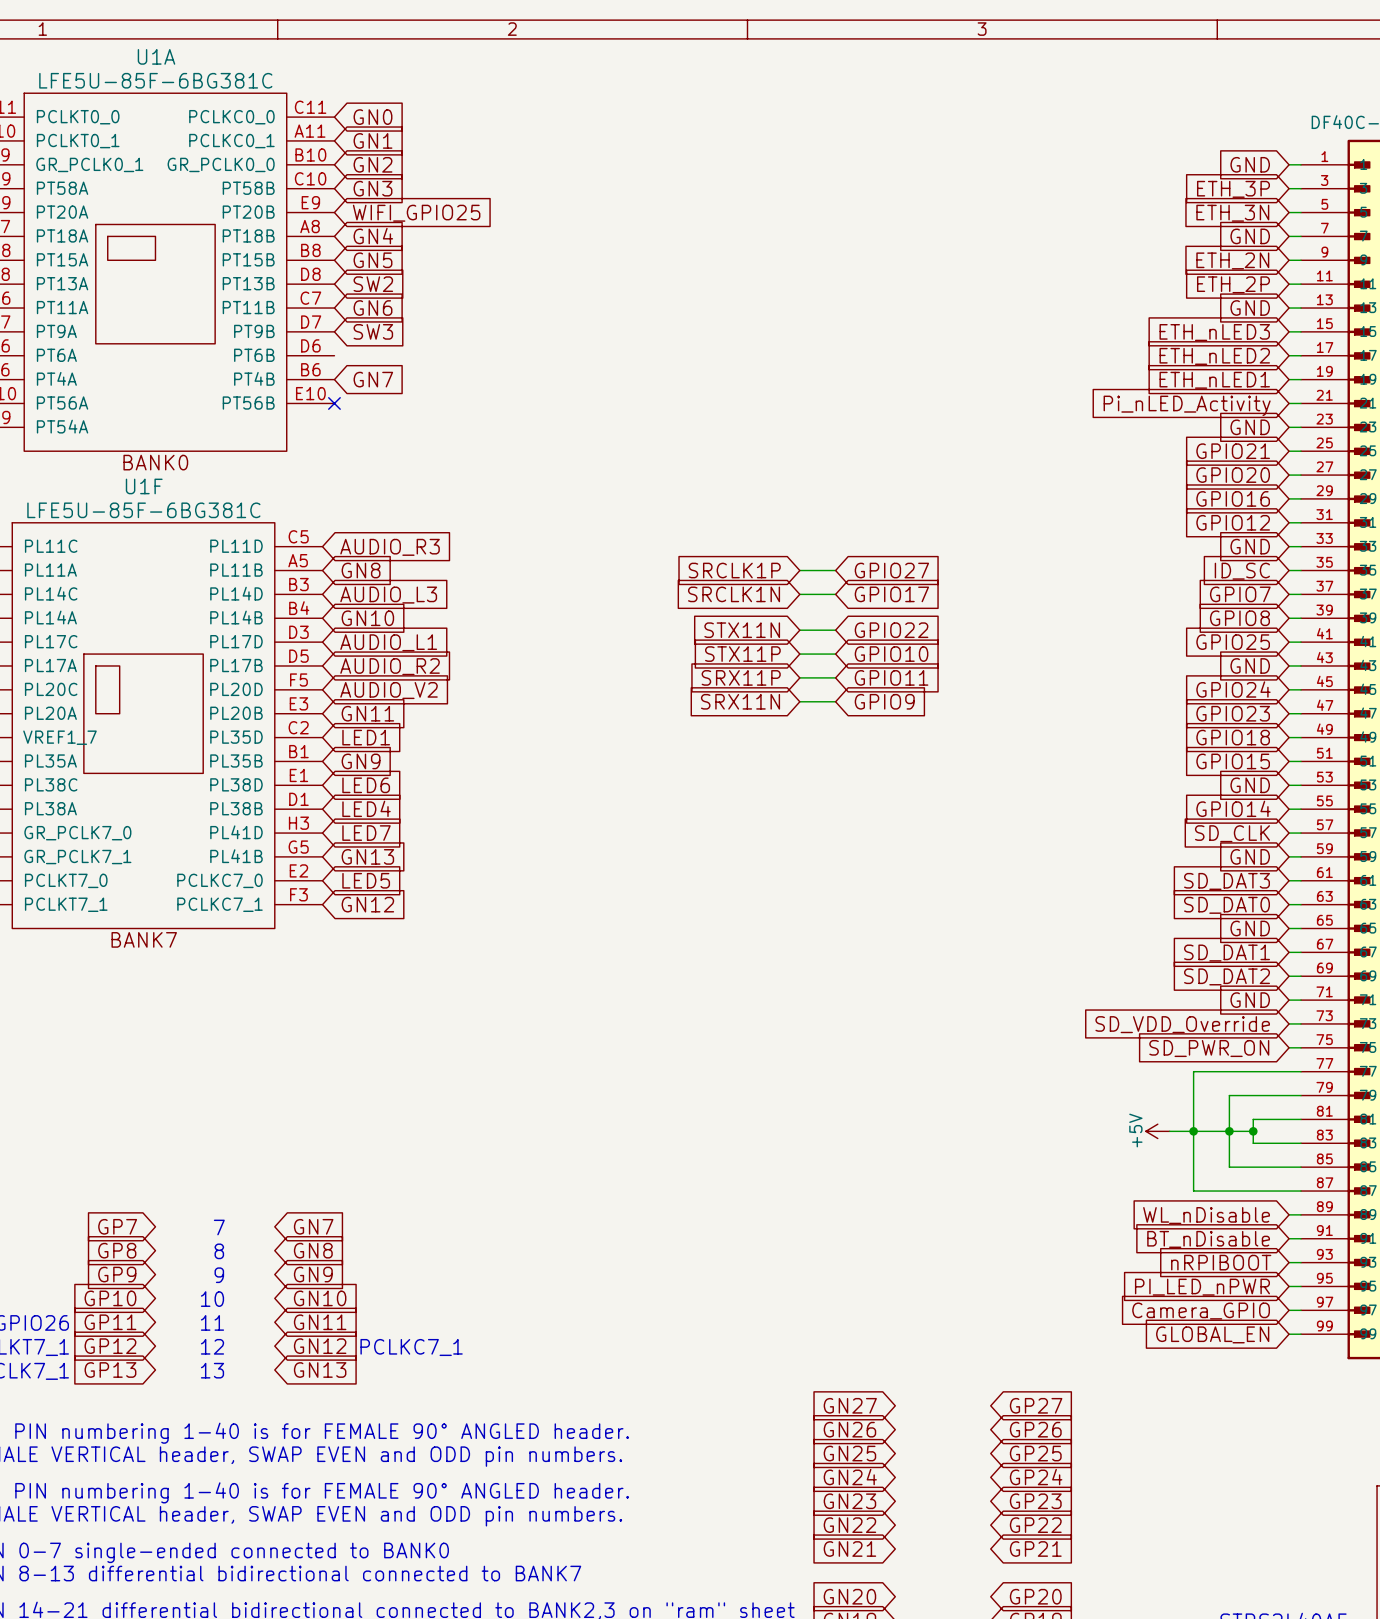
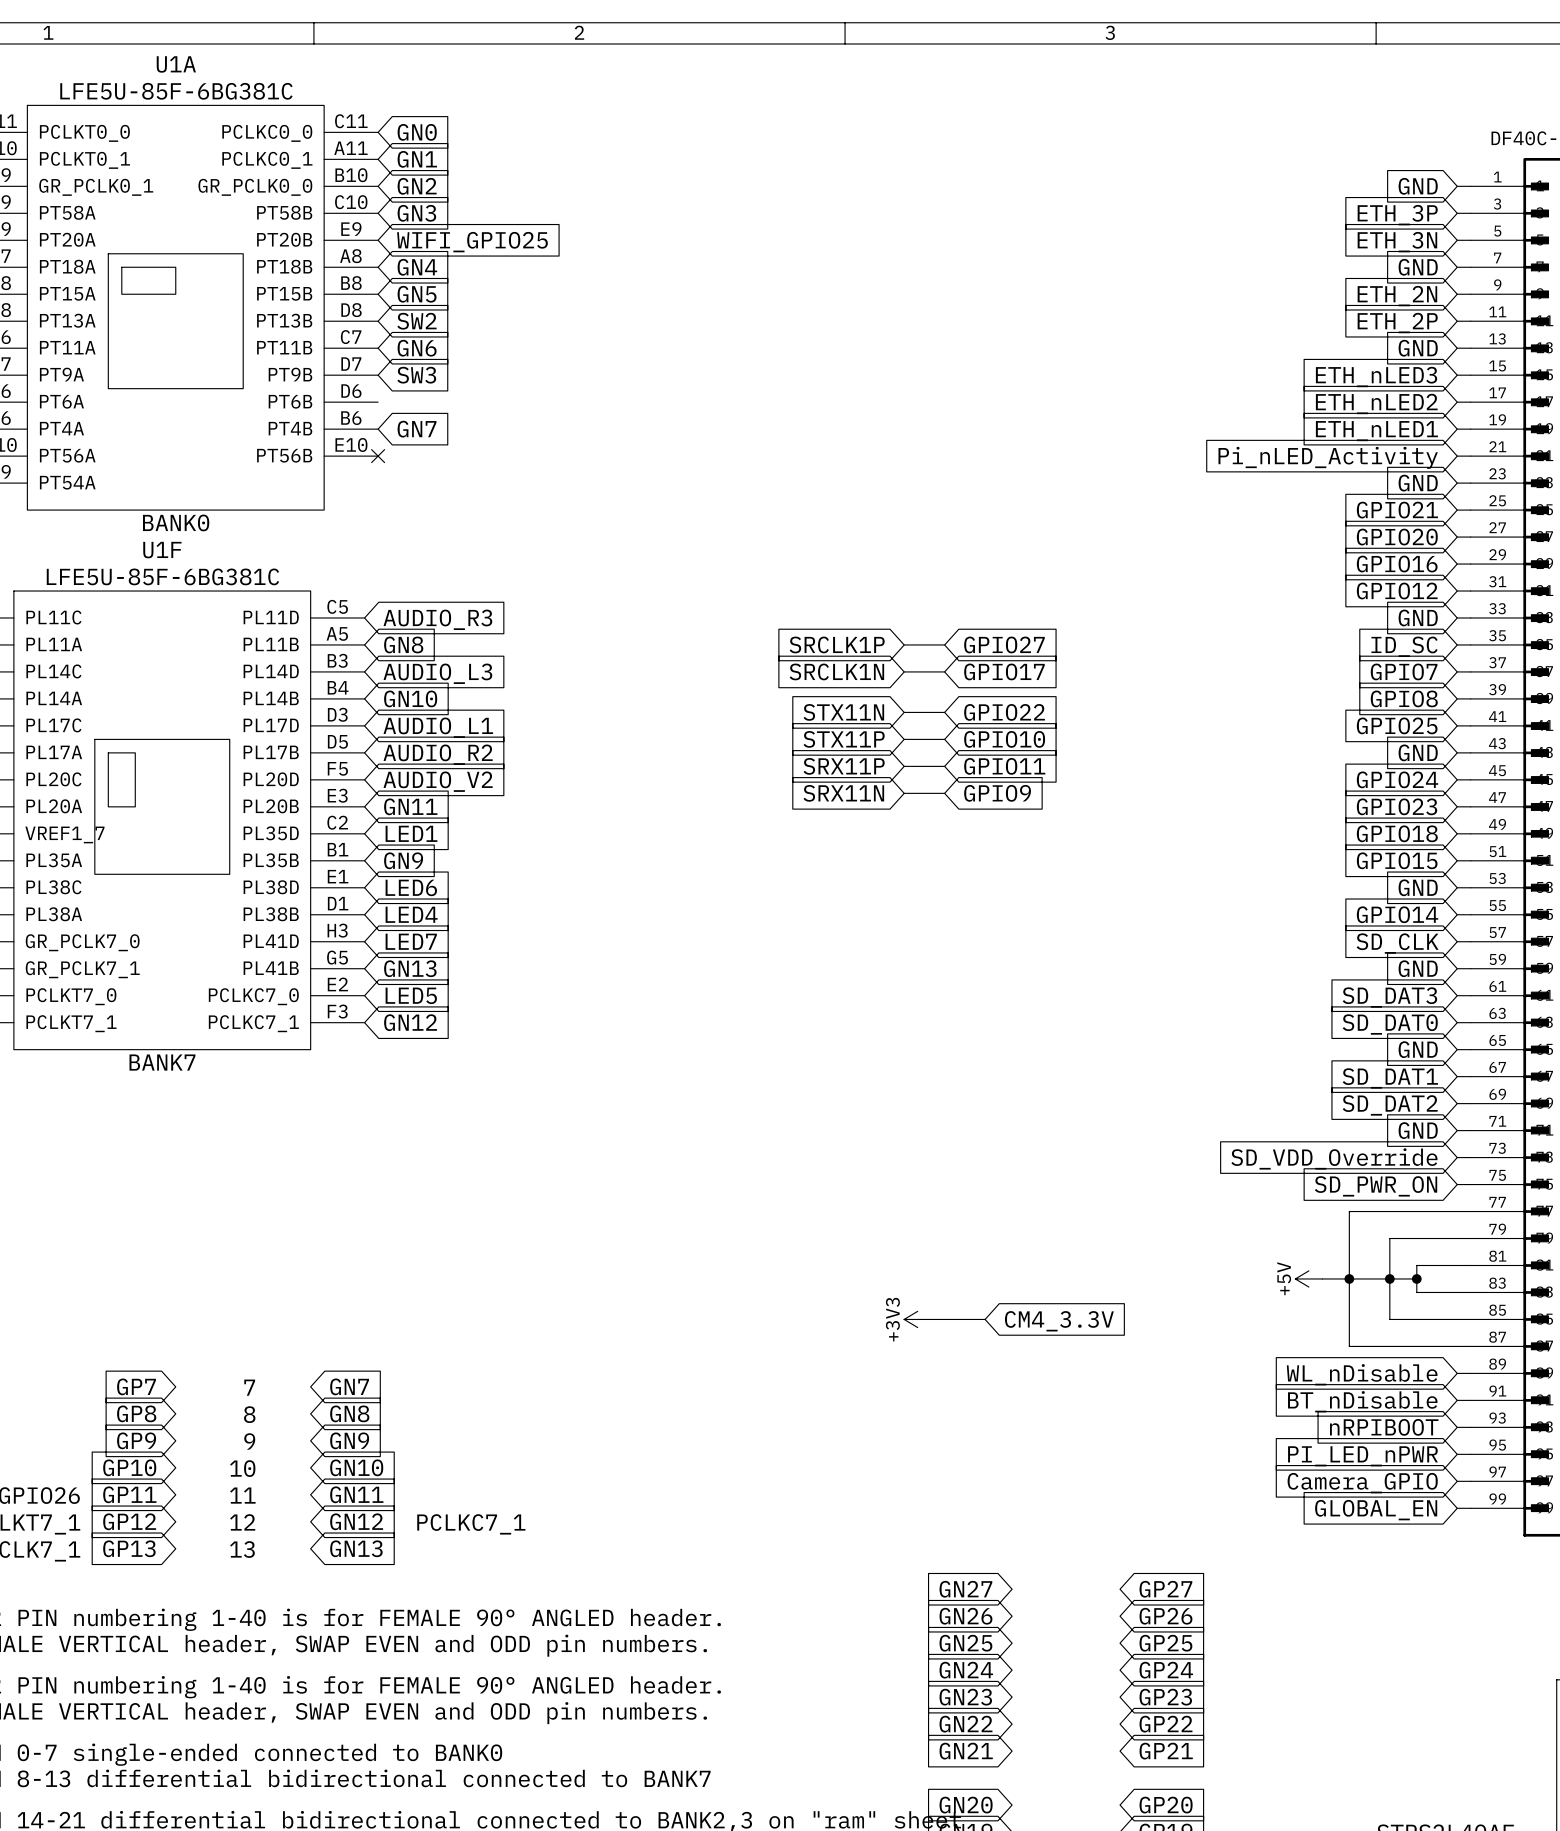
power symbol: none -> +3V3 (917, 1319)
wire: none -> (931, 1319) (985, 1319)
global label: none -> CM4_3.3V (1059, 1321)

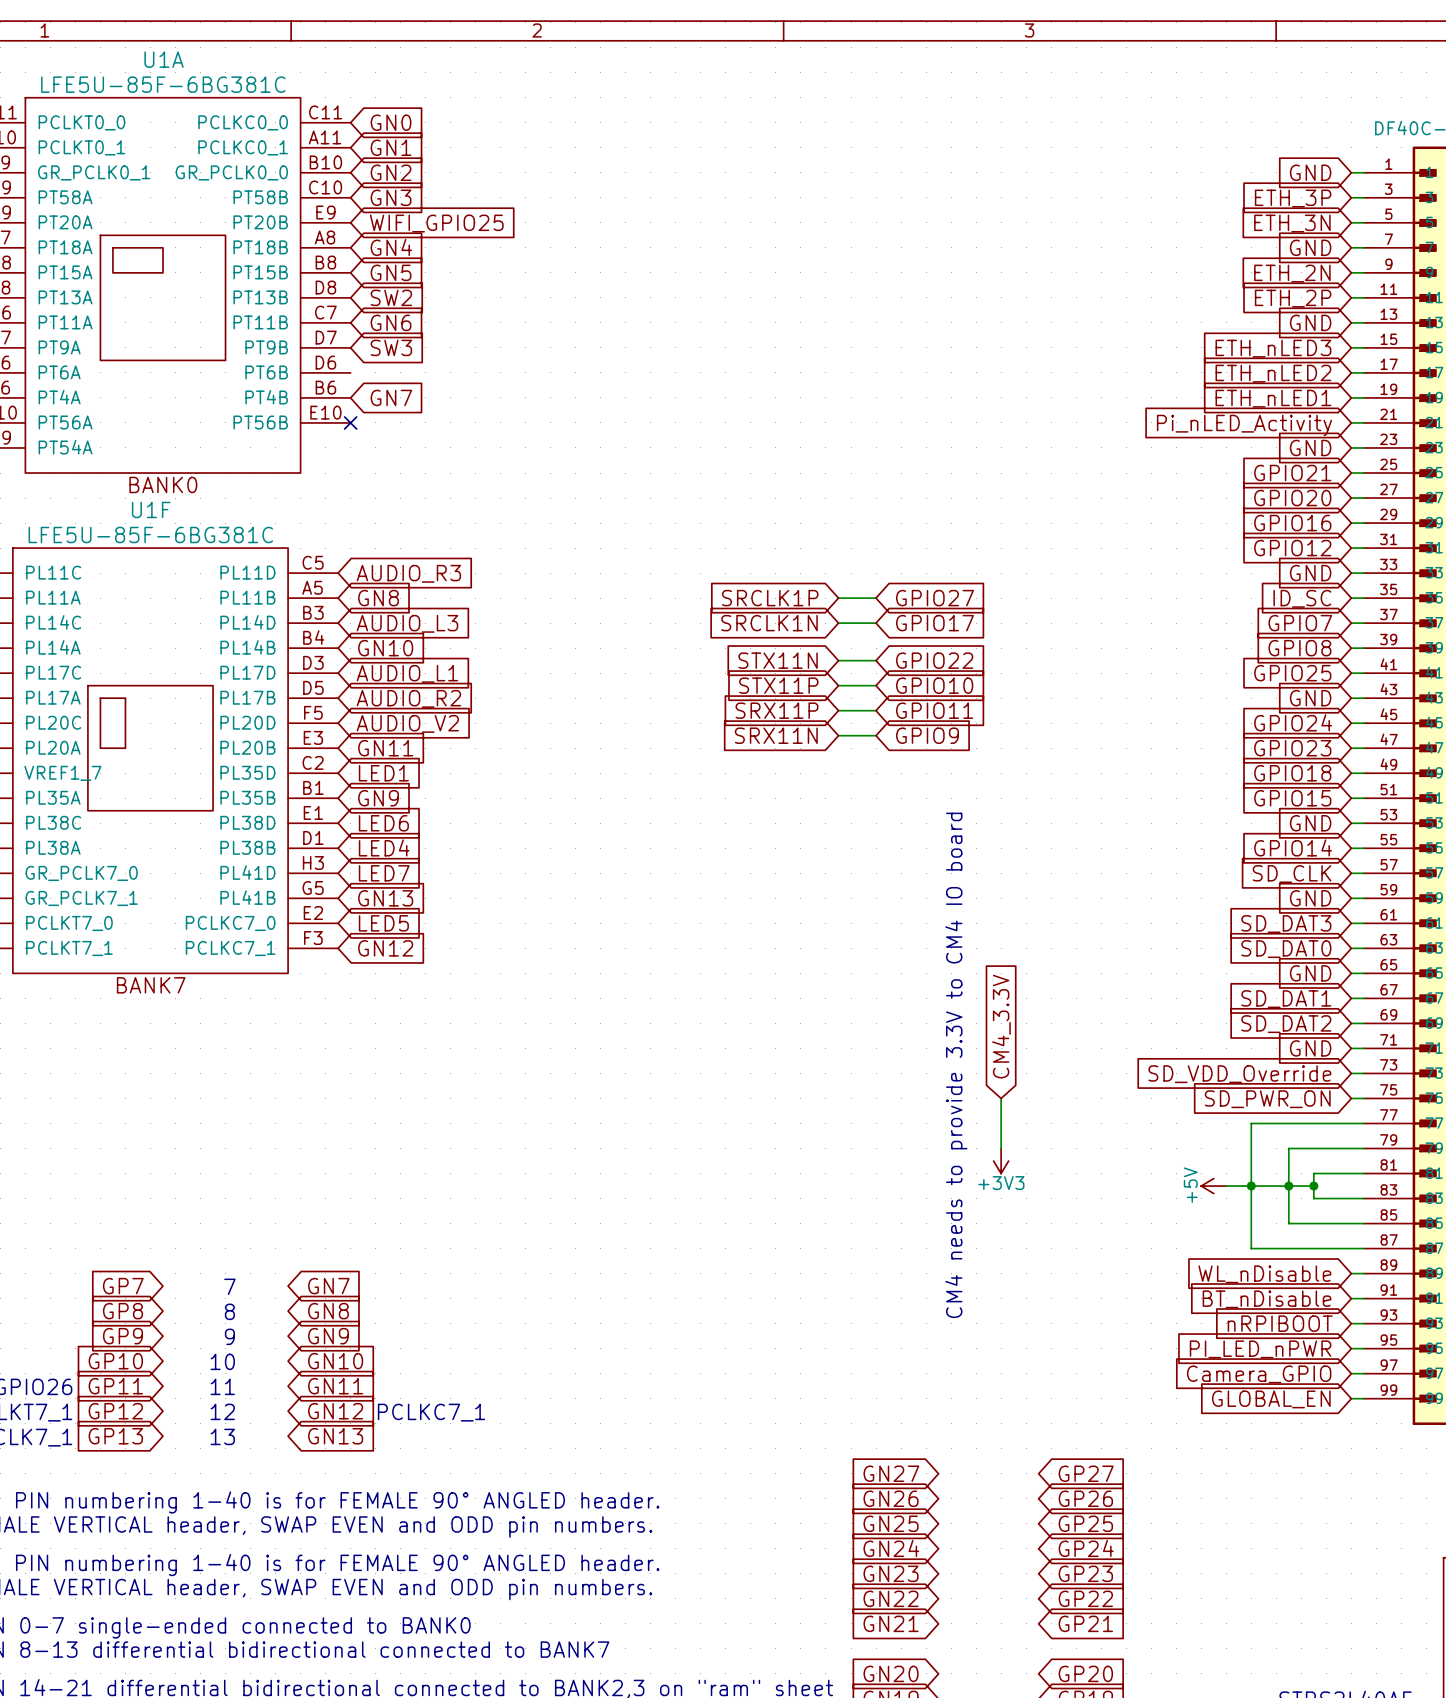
text: none -> CM4 needs to provide 3.3V to CM4 IO board (956, 1065)
wire: none -> (1001, 1098) (1001, 1148)
power symbol rotation: 0° (917, 1319) -> 90° counterclockwise (1001, 1161)
power symbol position: +3V3 (917, 1319) -> +3V3 (1001, 1161)
wire: (931, 1319) (985, 1319) -> none
global label rotation: 0° (1059, 1321) -> 90° counterclockwise (1001, 1026)
global label position: CM4_3.3V (1059, 1321) -> CM4_3.3V (1001, 1026)

